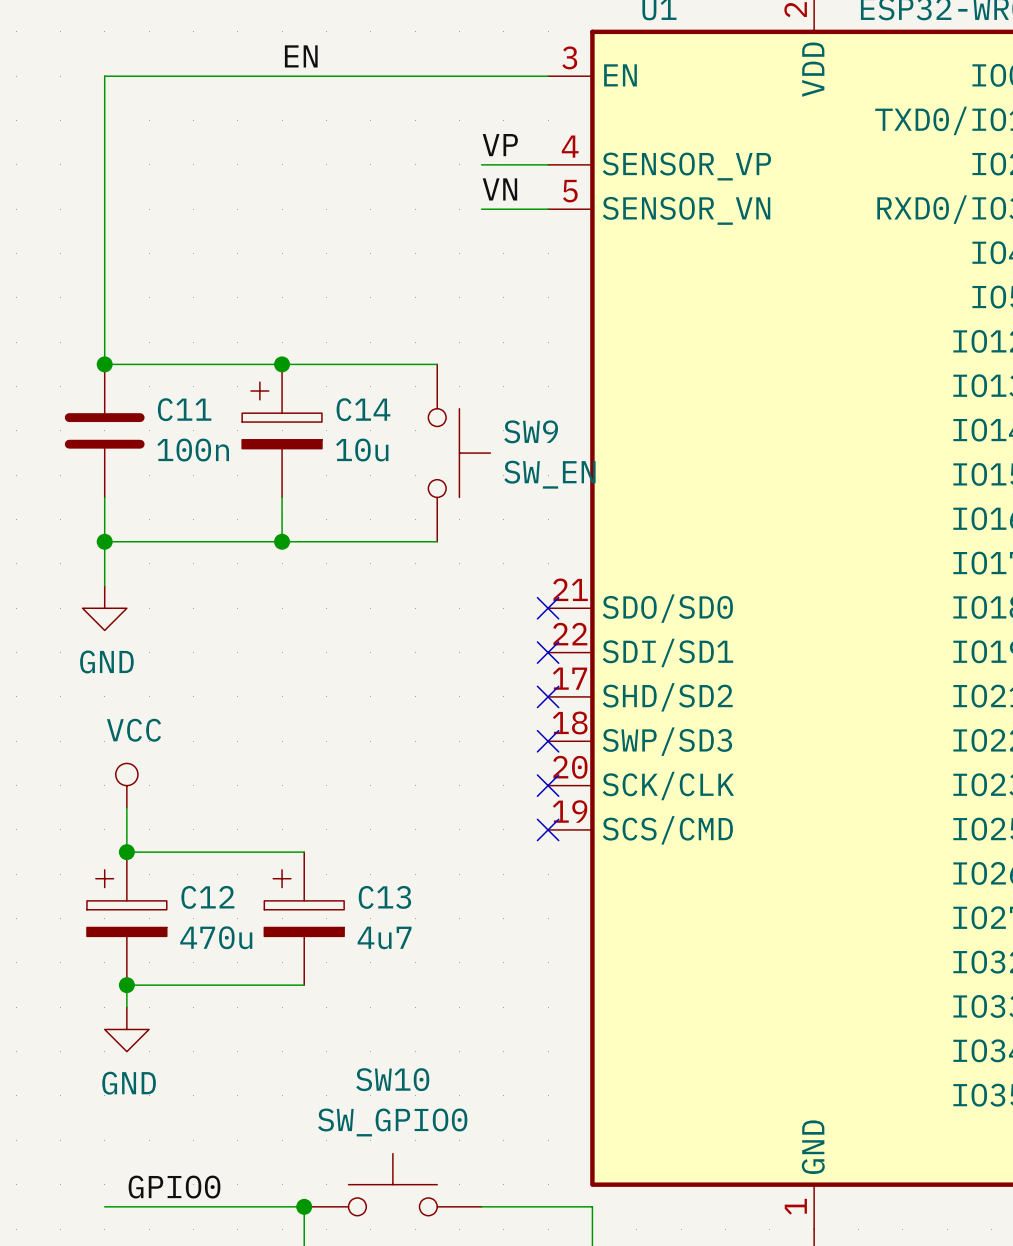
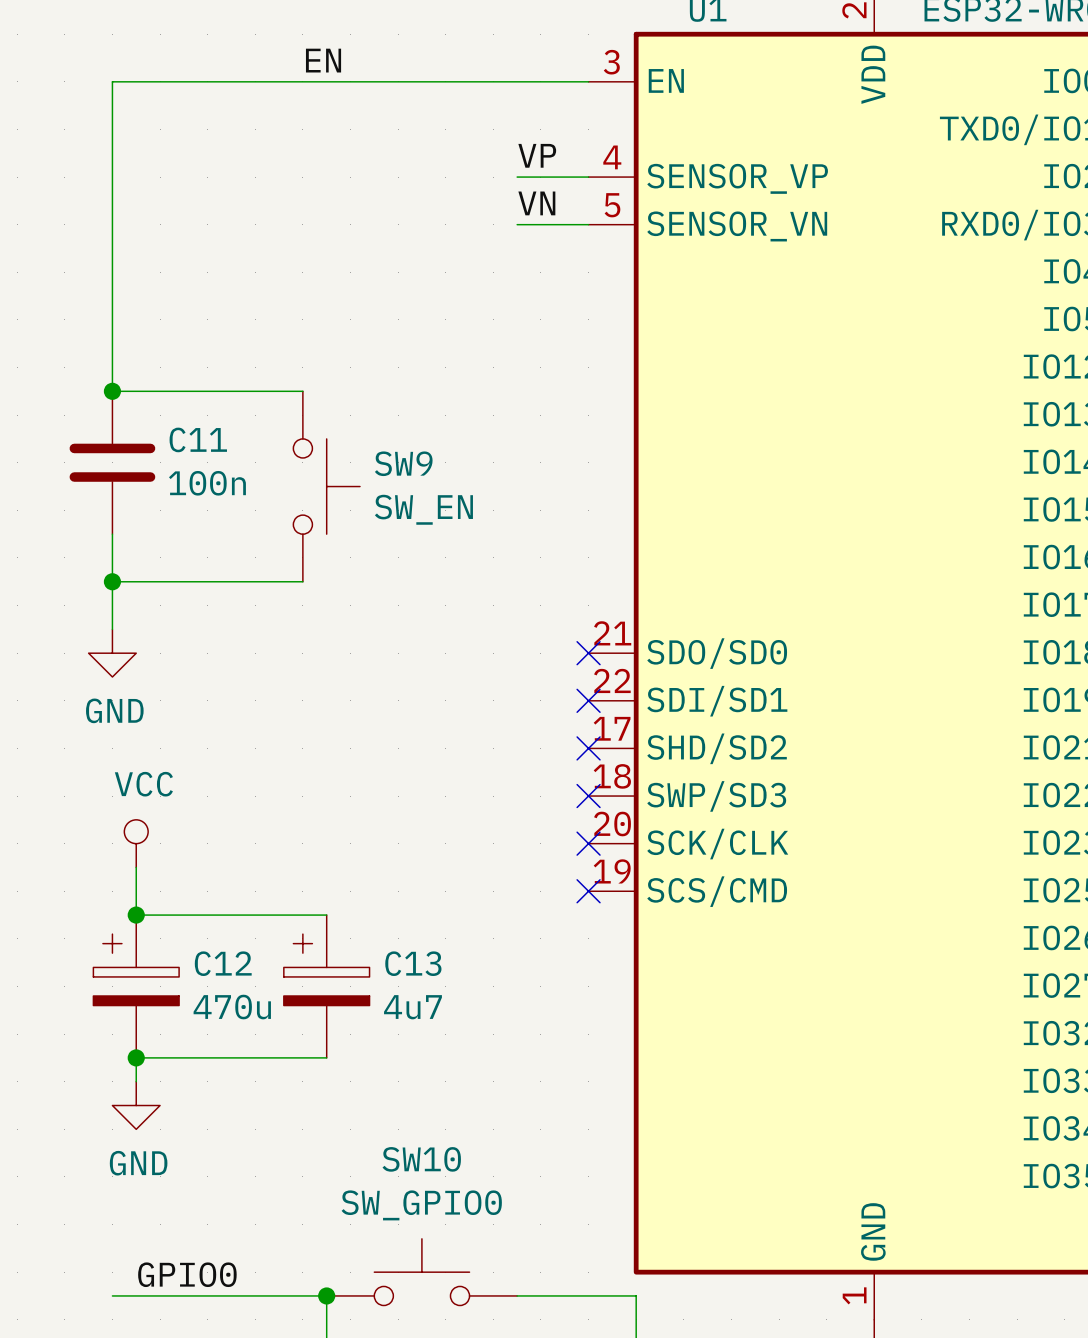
wire: (282, 364) (437, 364) -> none
junction: (282, 364) -> none
C14: 10u (282, 430) -> none
SW9 position: (459, 453) -> (326, 486)
wire: (282, 497) (282, 541) (437, 541) -> none
junction: (282, 541) -> none

